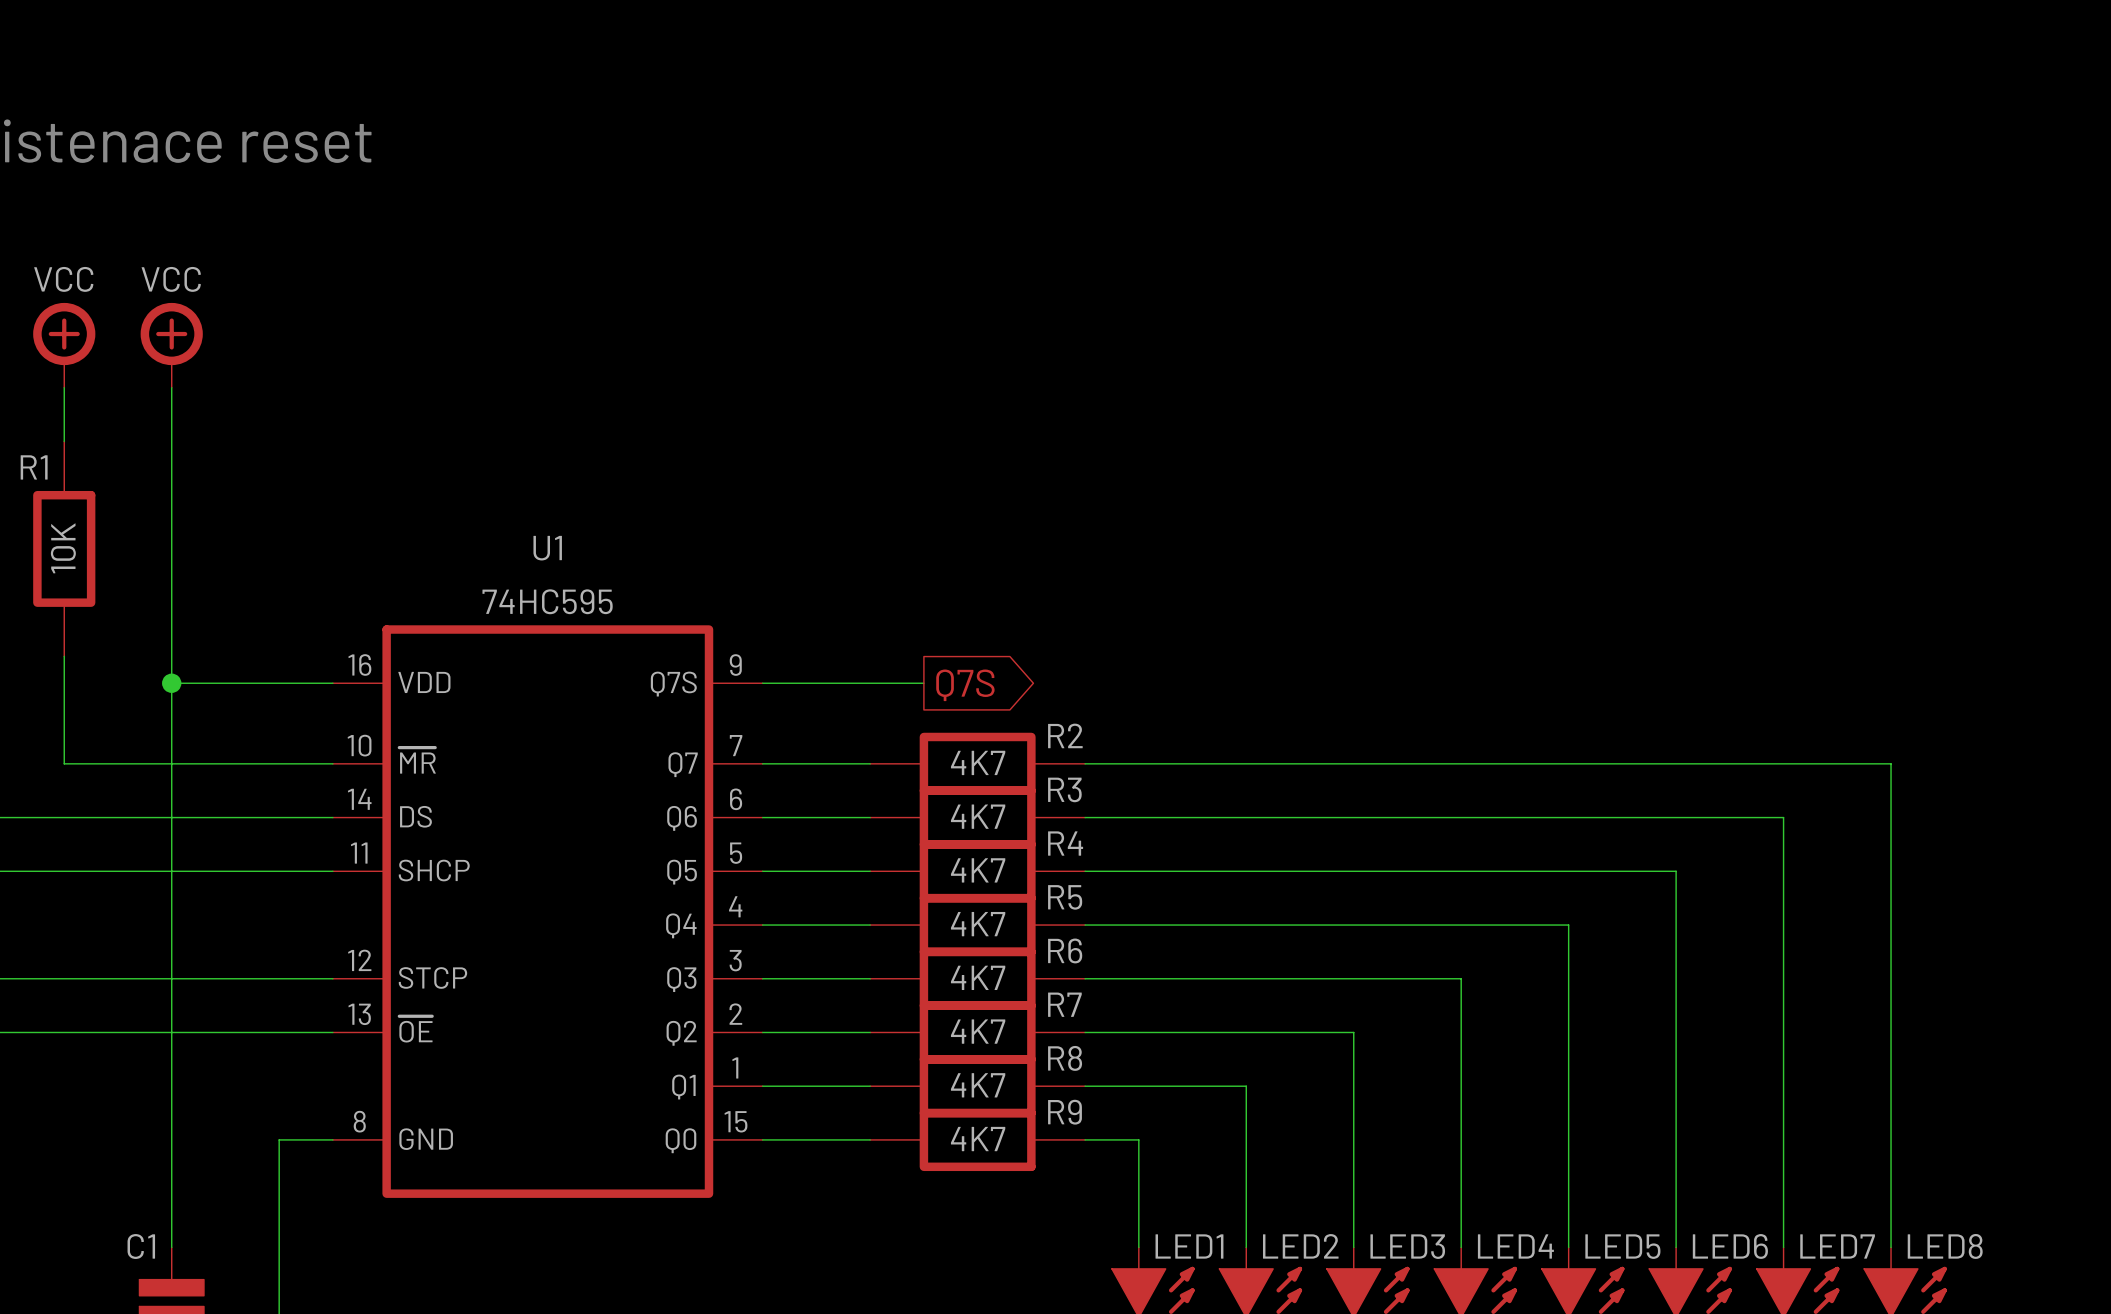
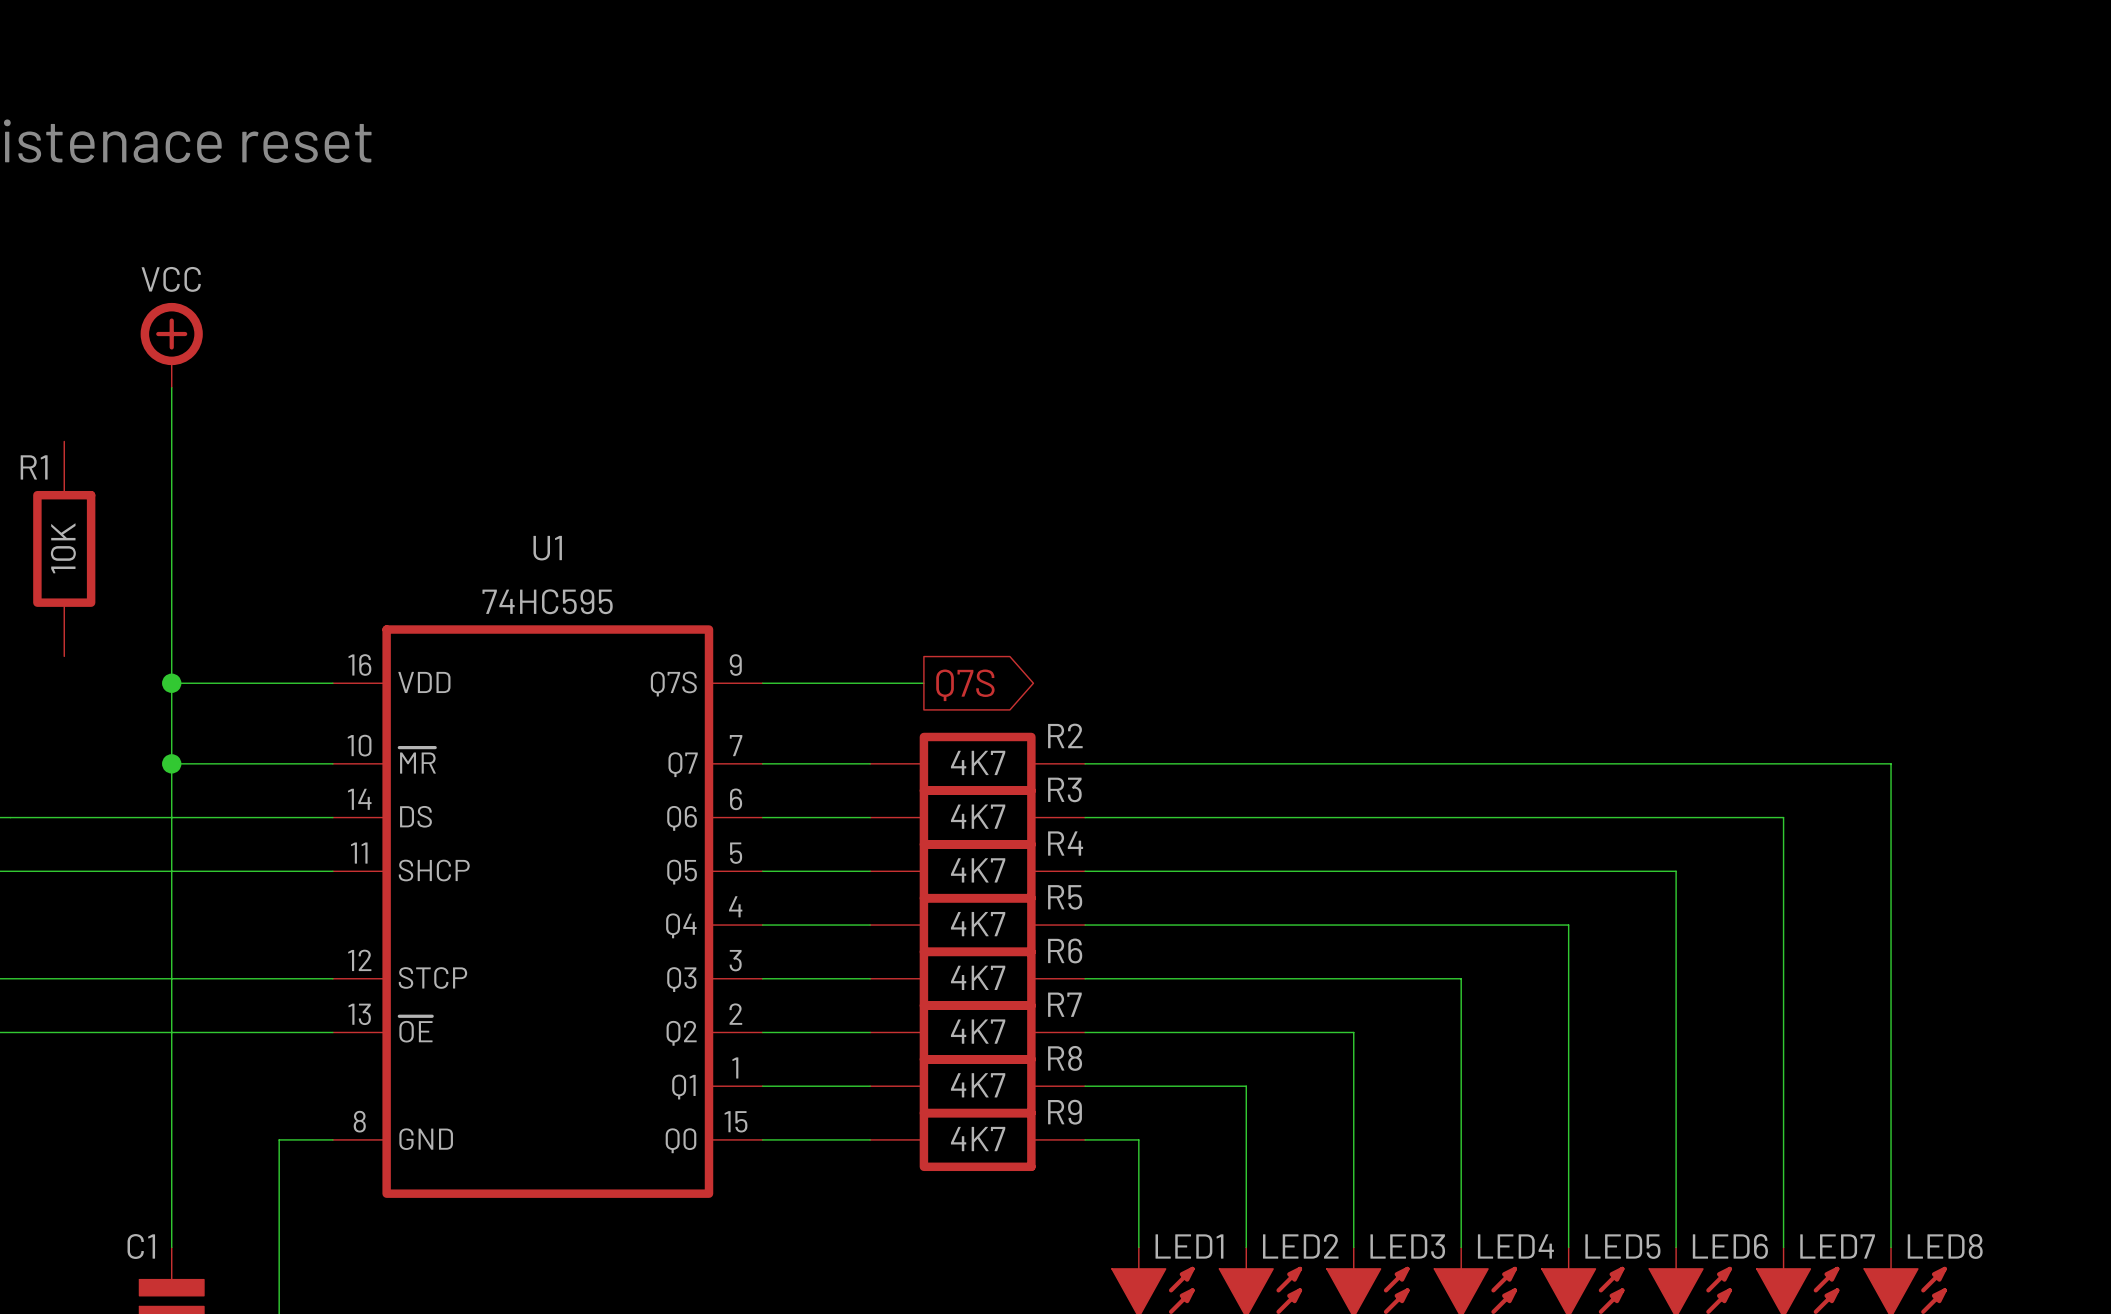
power symbol: (64, 345) -> none
wire: (64, 387) (64, 441) -> none
wire: (64, 656) (64, 763) (171, 763) -> none
junction: none -> (171, 763)

